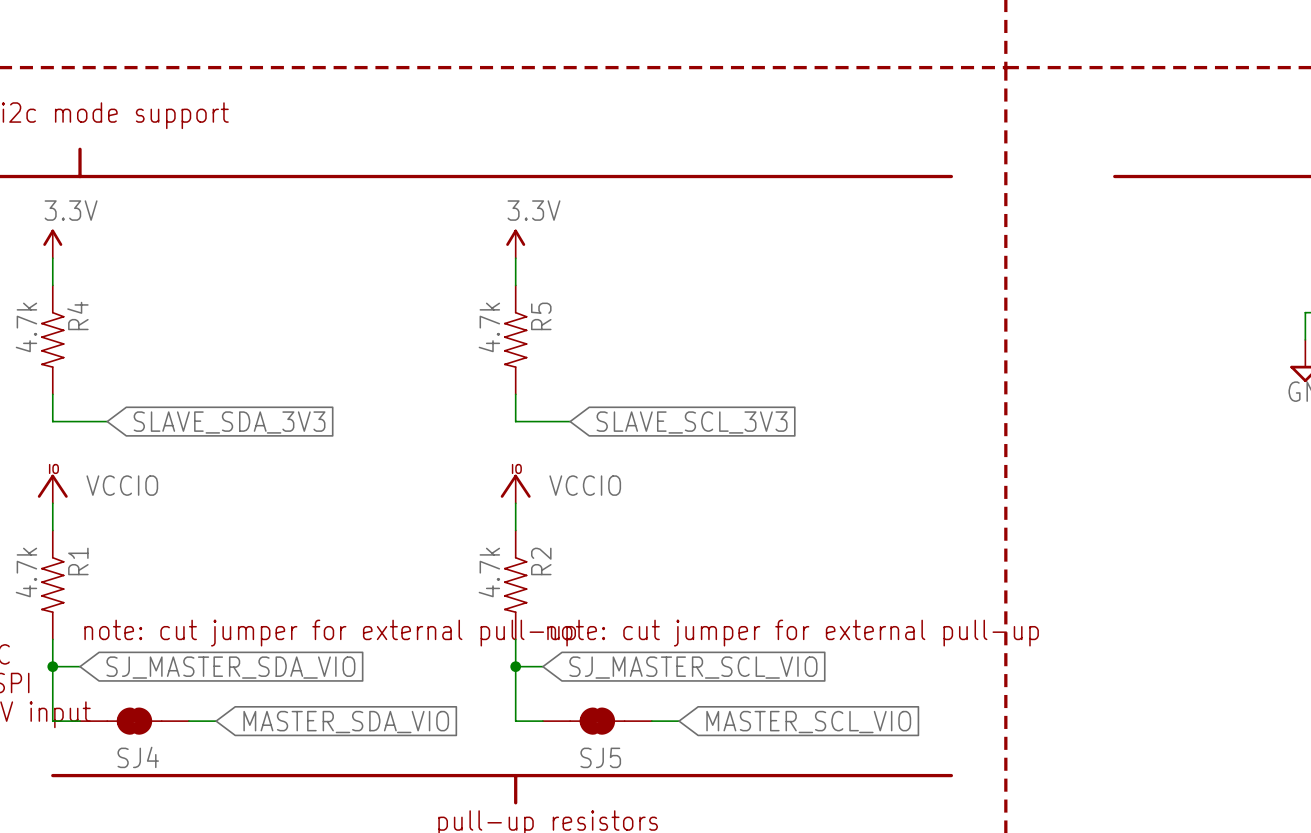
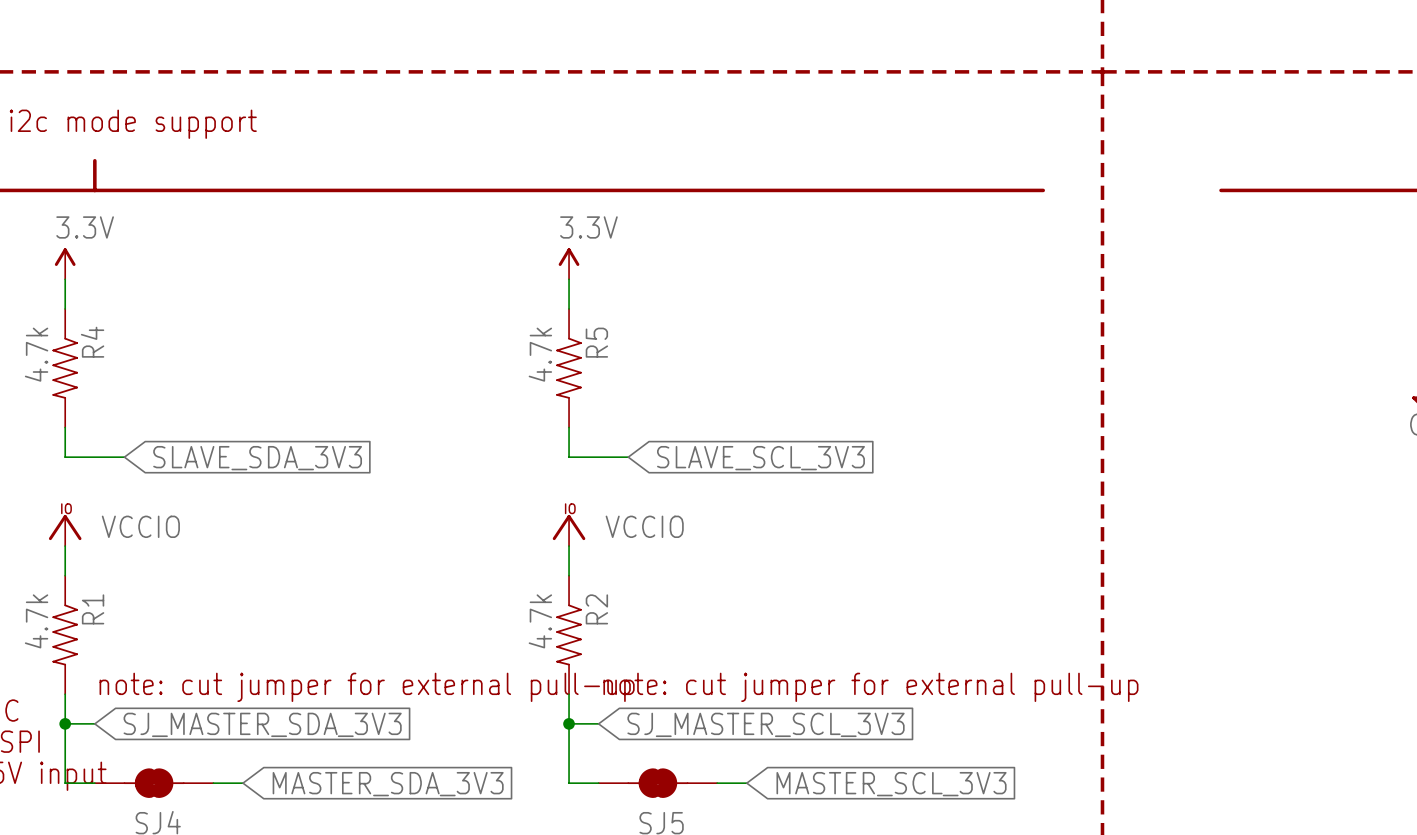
global label: SJ_MASTER_SDA_VIO (230, 667) -> SJ_MASTER_SDA_3V3 (262, 724)
global label: SJ_MASTER_SCL_VIO (693, 667) -> SJ_MASTER_SCL_3V3 (766, 724)
global label: MASTER_SDA_VIO (346, 722) -> MASTER_SDA_3V3 (388, 784)
global label: MASTER_SCL_VIO (808, 722) -> MASTER_SCL_3V3 (891, 784)

